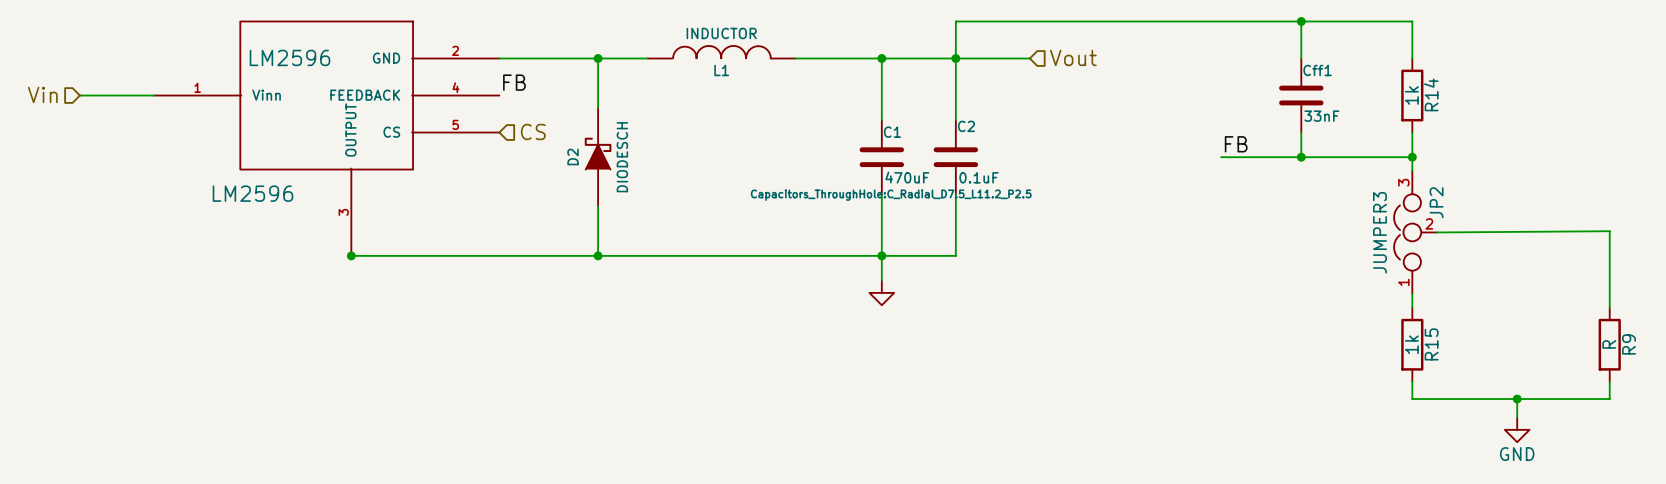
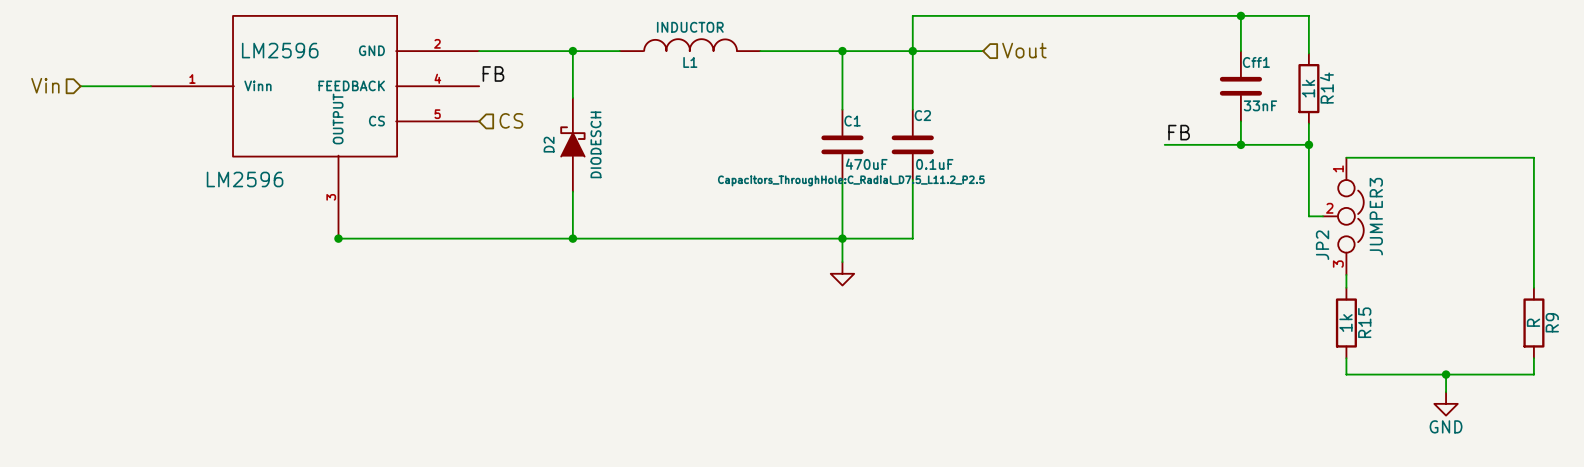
wire: (1372, 21) (1412, 21) (1412, 58) -> (1308, 15) (1308, 53)
R14 position: (1412, 95) -> (1308, 88)
wire: (1412, 132) (1412, 170) -> none
wire: none -> (1308, 123) (1308, 216) (1322, 216)
wire: (1372, 157) (1412, 157) -> none
junction position: (1412, 157) -> (1308, 144)
wire: (1609, 231) (1437, 232) -> (1533, 215) (1533, 157) (1346, 157)
JP2 rotation: 0° (1407, 232) -> 180° (1350, 216)

